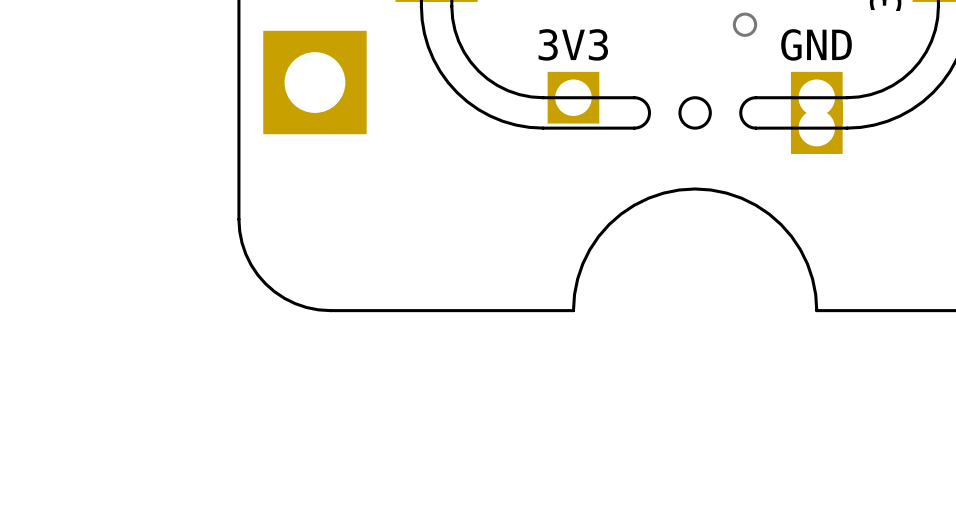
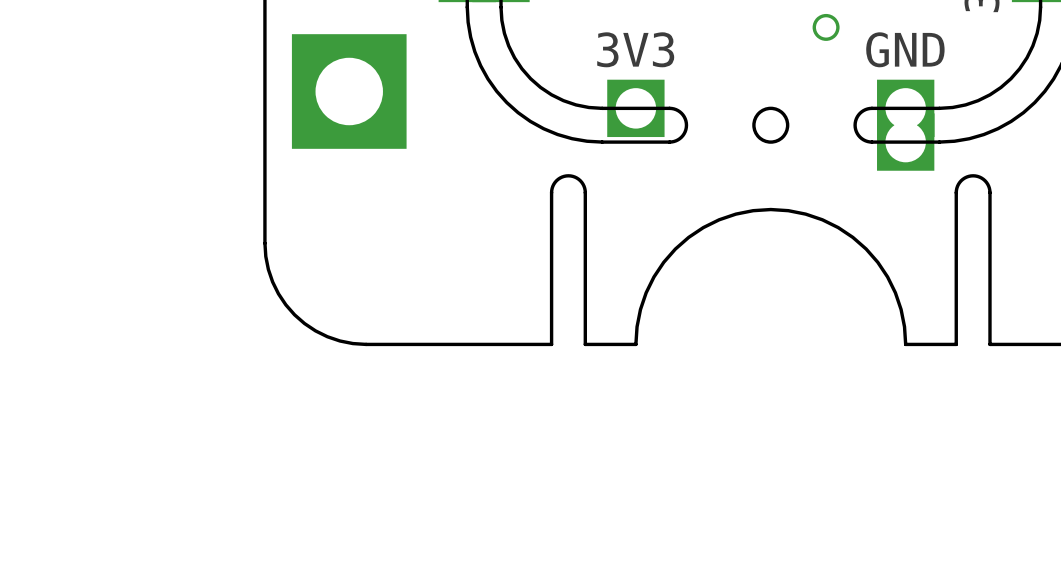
board edge: (603, 97) (638, 98) (646, 103) (649, 112) (646, 122) (638, 127) (603, 128) -> (669, 108) (681, 113) (686, 125) (681, 137) (669, 142)
board edge: (786, 97) (752, 98) (743, 103) (740, 112) (743, 122) (752, 127) (786, 128) -> (871, 108) (860, 113) (855, 125) (860, 137) (871, 142)
board edge: (527, 310) (497, 310) -> (585, 344) (585, 190) (580, 180) (568, 175) (556, 180) (551, 190) (551, 344)
board edge: (892, 310) (862, 310) -> (989, 344) (989, 190) (985, 180) (973, 175) (961, 180) (956, 190) (956, 344)

